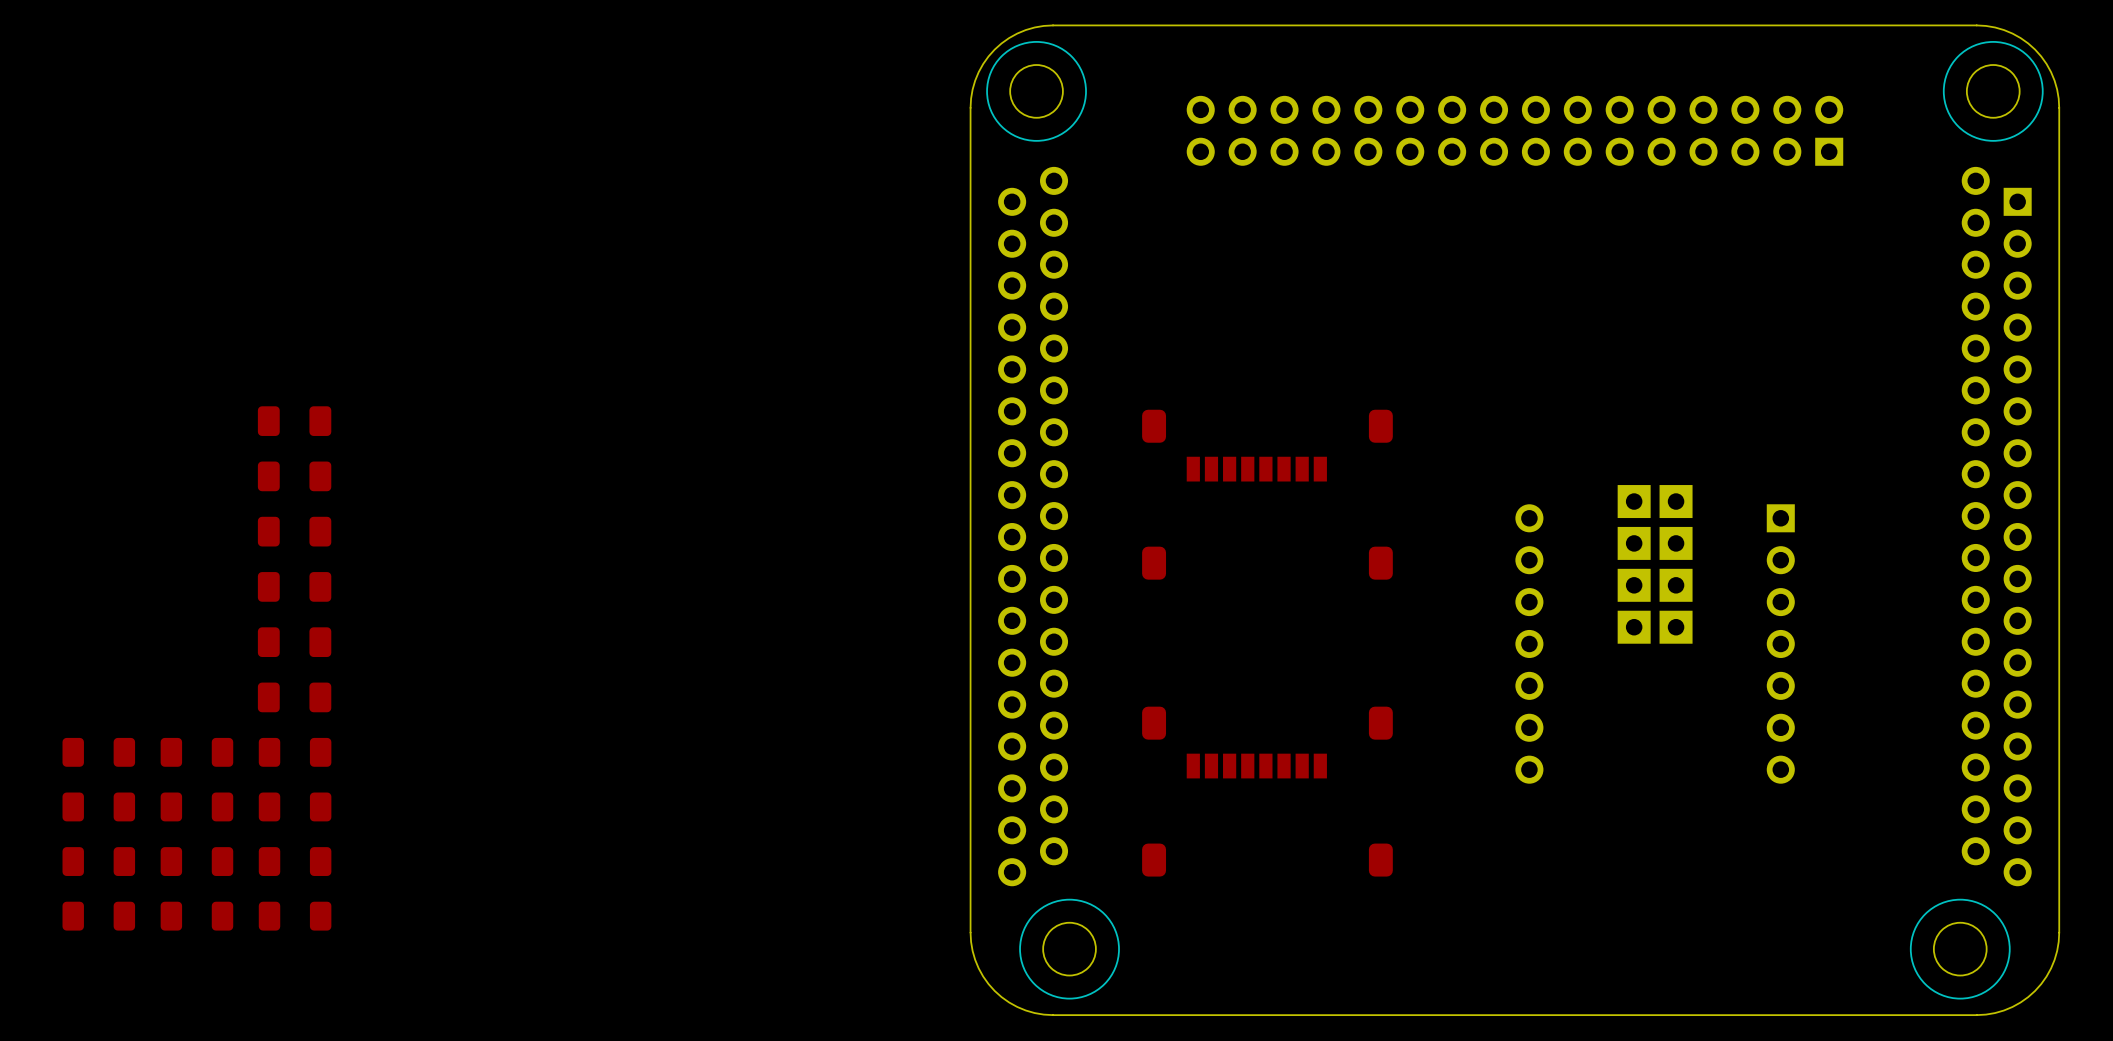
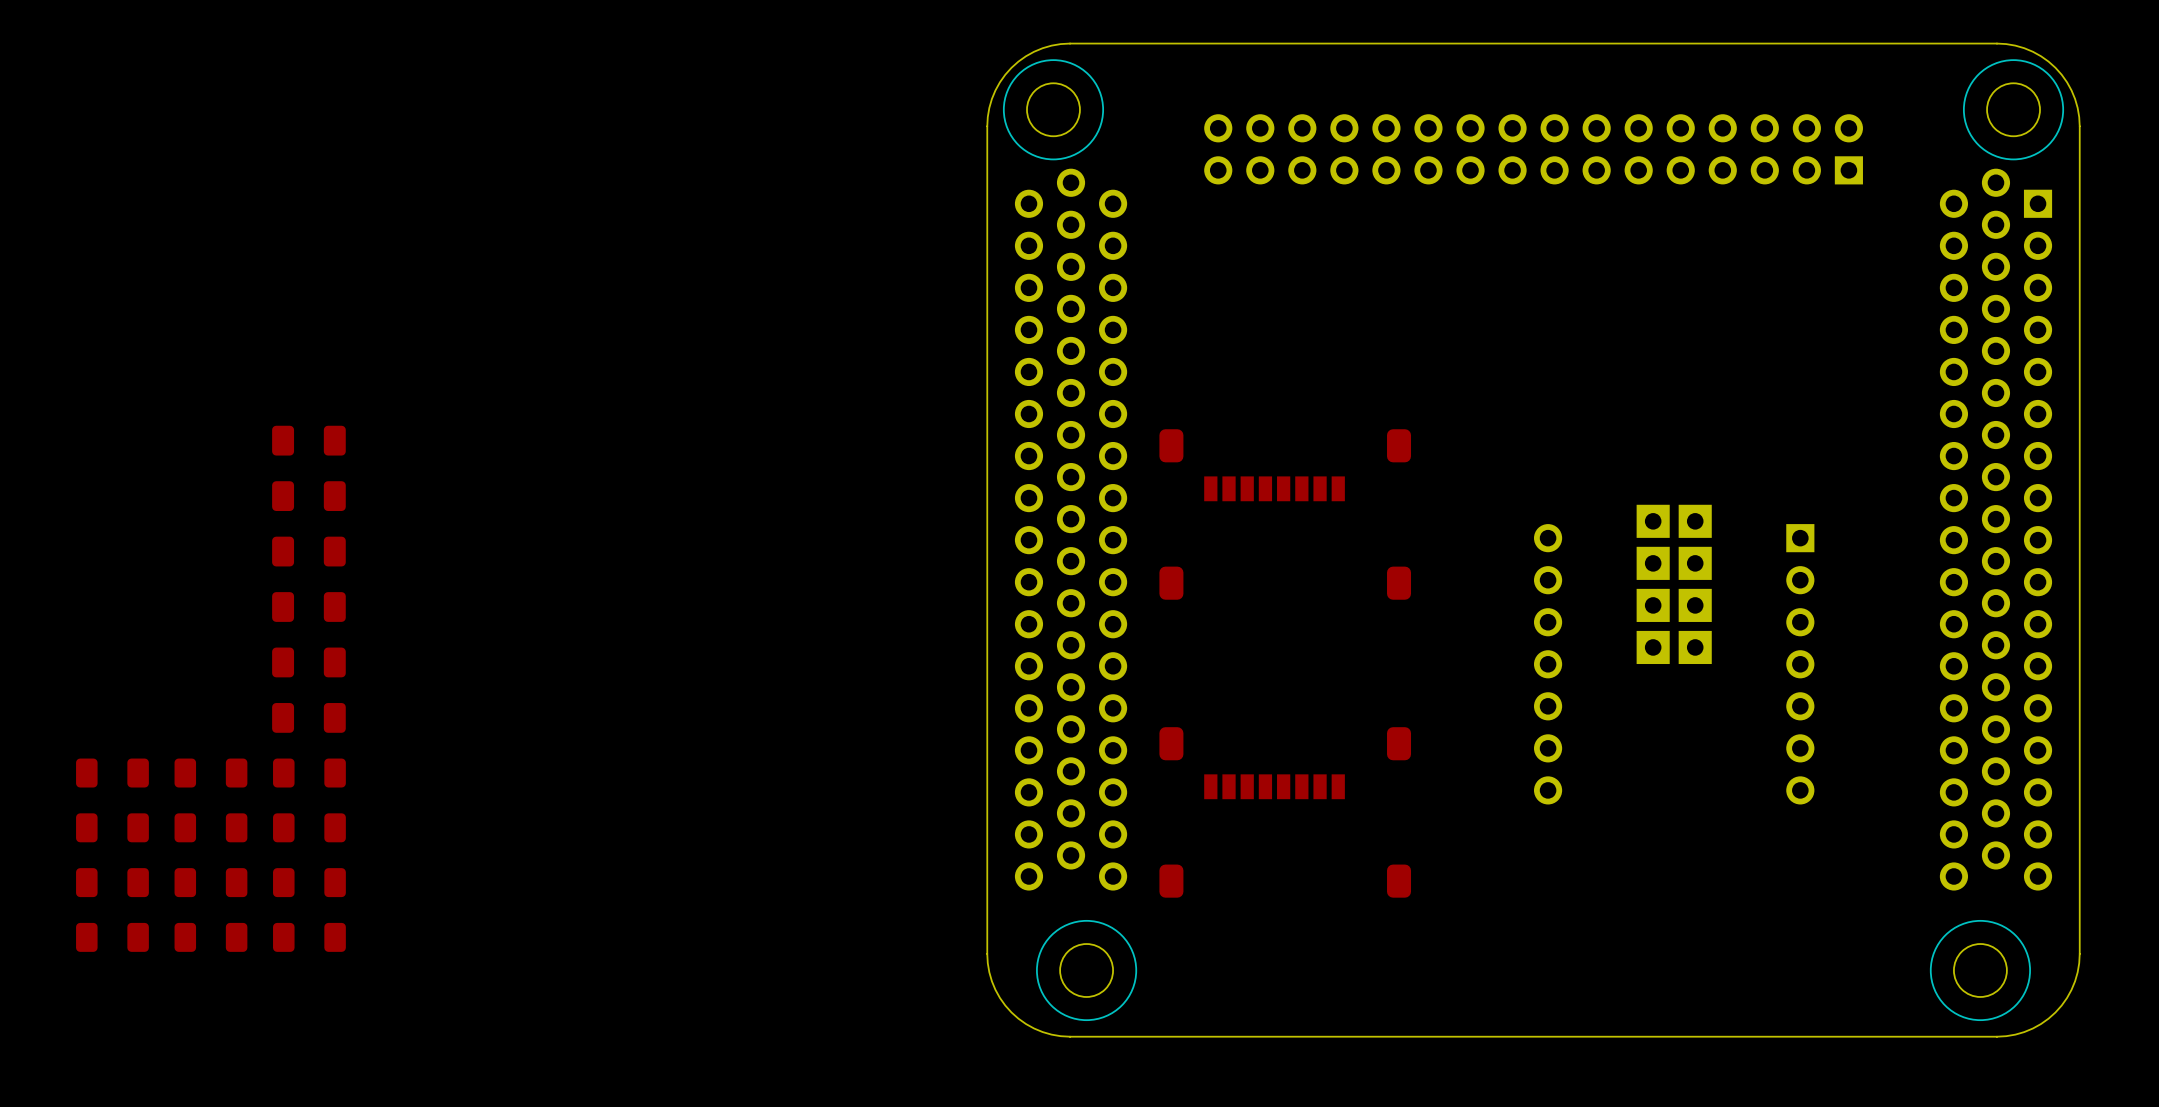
part footprint: [970, 25, 2060, 1016] -> [986, 43, 2081, 1038]

